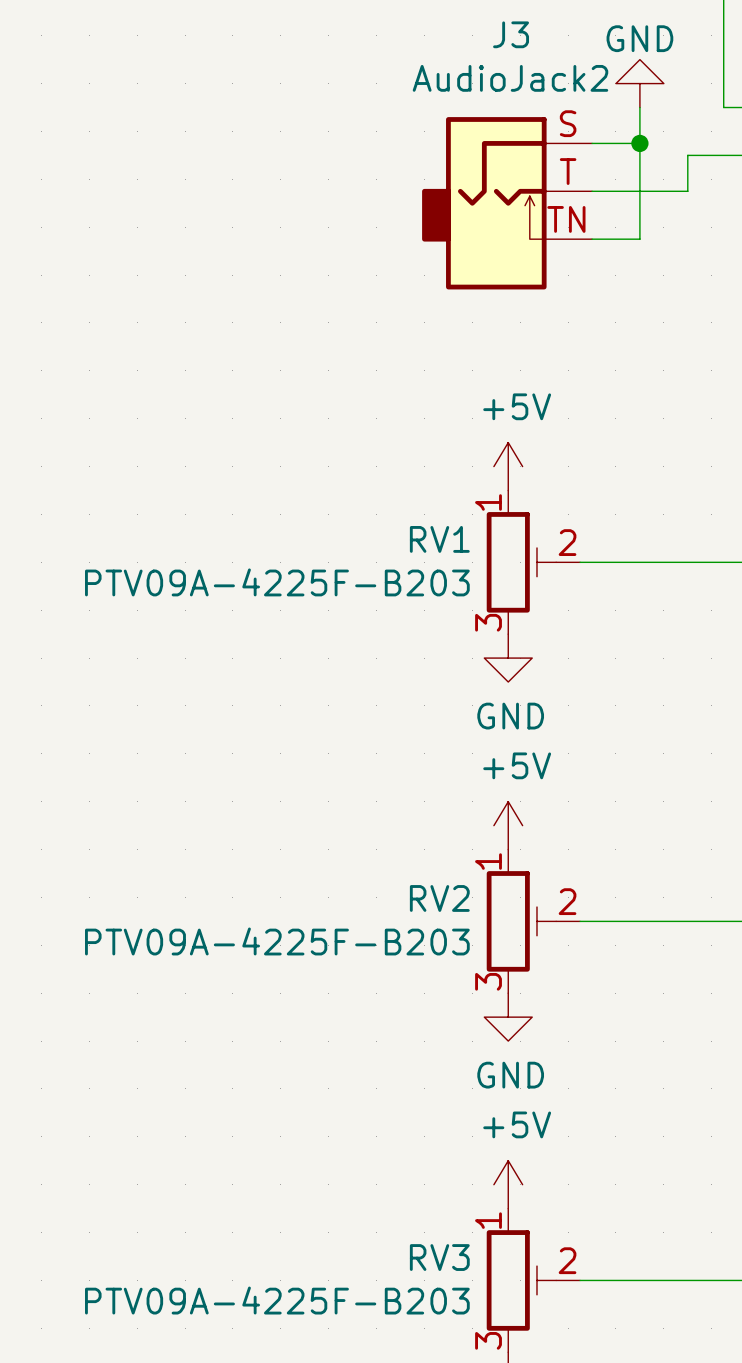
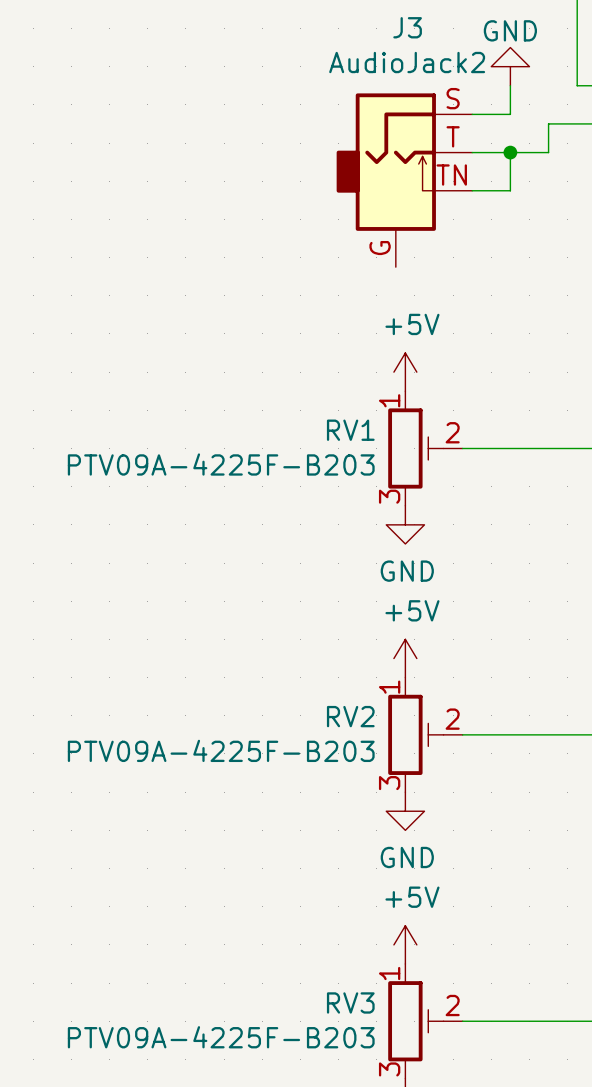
J3 symbol: [422, 117, 593, 290] -> [336, 93, 473, 268]
wire: (639, 143) (639, 191) -> none
junction position: (639, 143) -> (510, 152)

